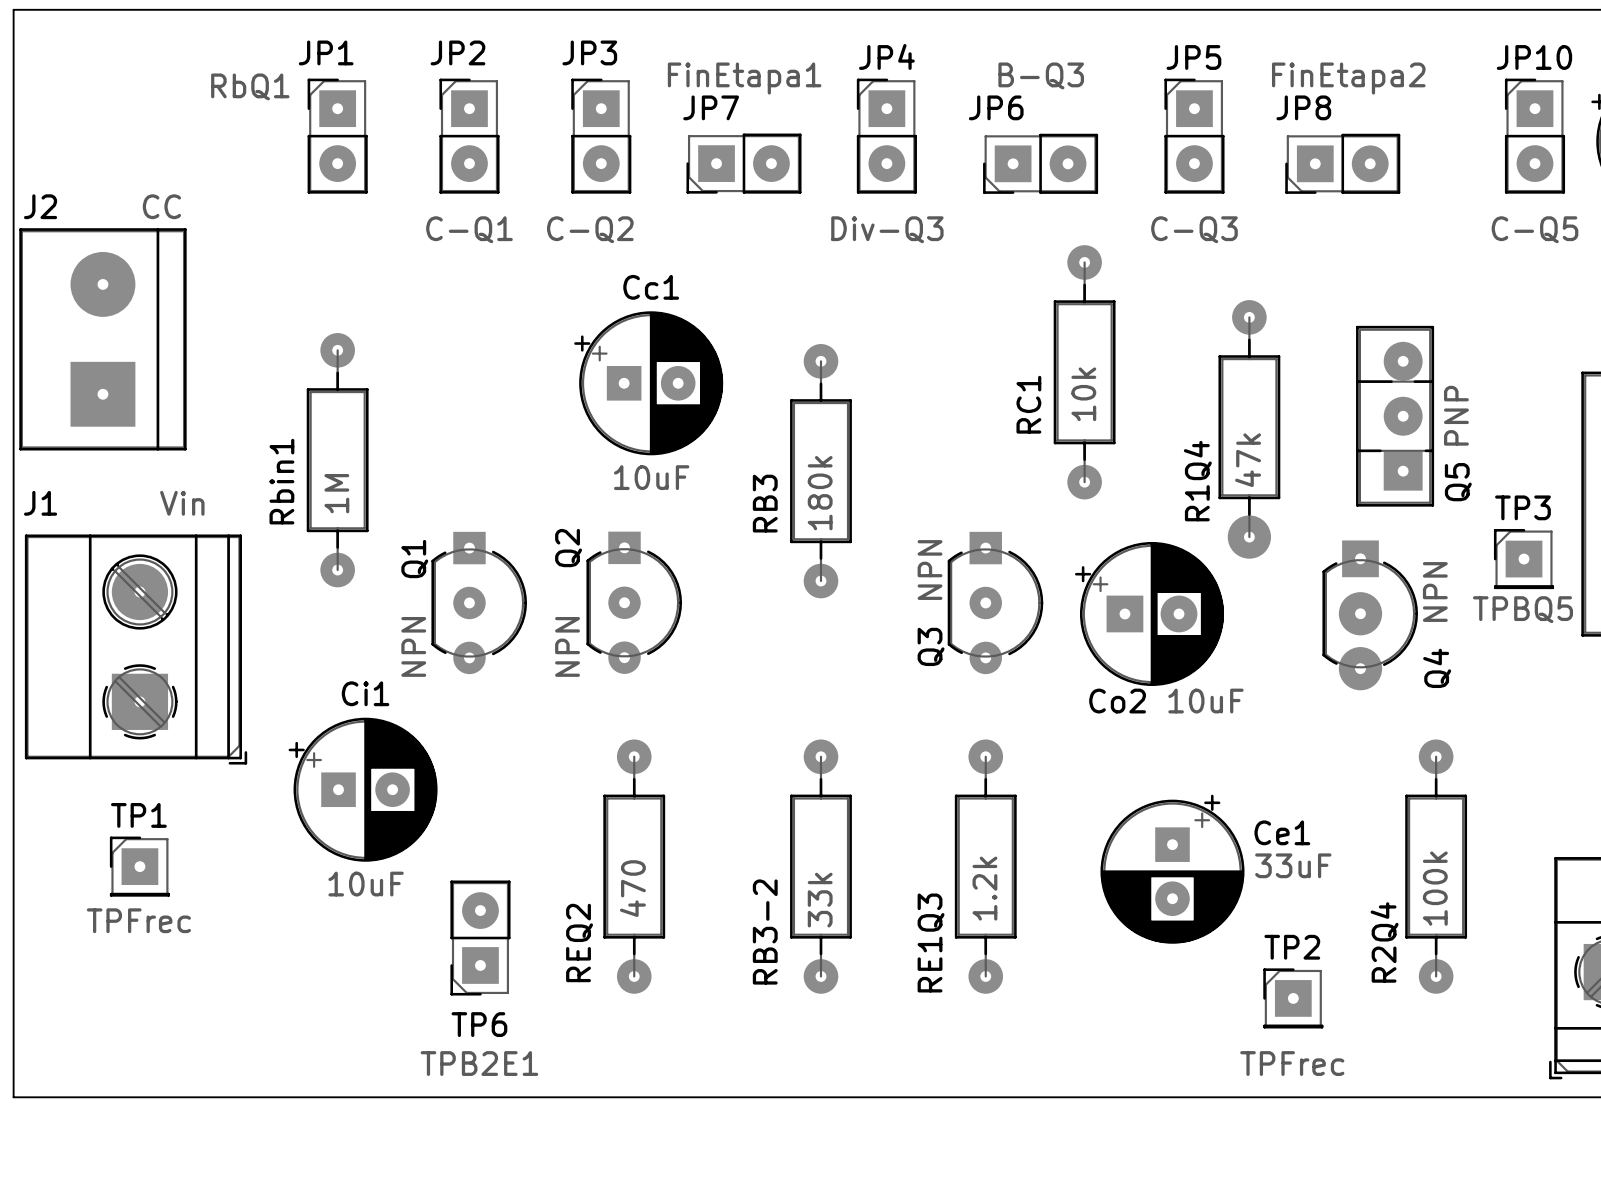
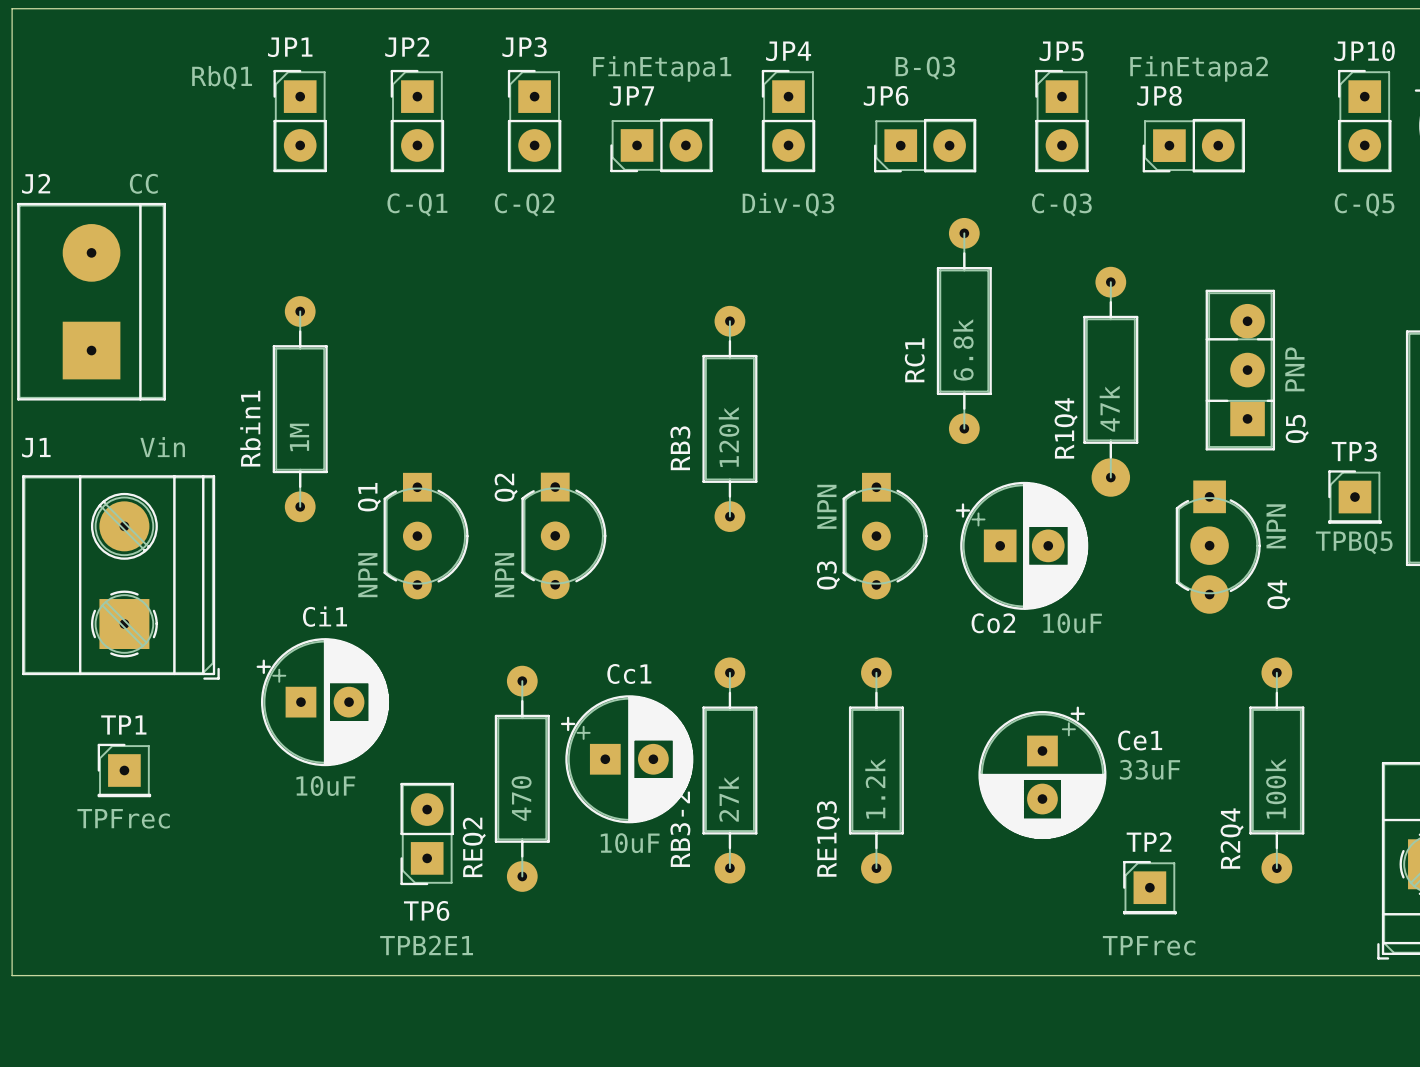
Cc1 position: (648, 383) -> (627, 759)
RC1 value: 10k (1083, 394) -> 6.8k (963, 349)
RB3 value: 180k (820, 493) -> 120k (728, 437)
REQ2 position: (634, 866) -> (522, 778)
RB3-2 value: 33k (820, 900) -> 27k (728, 799)

